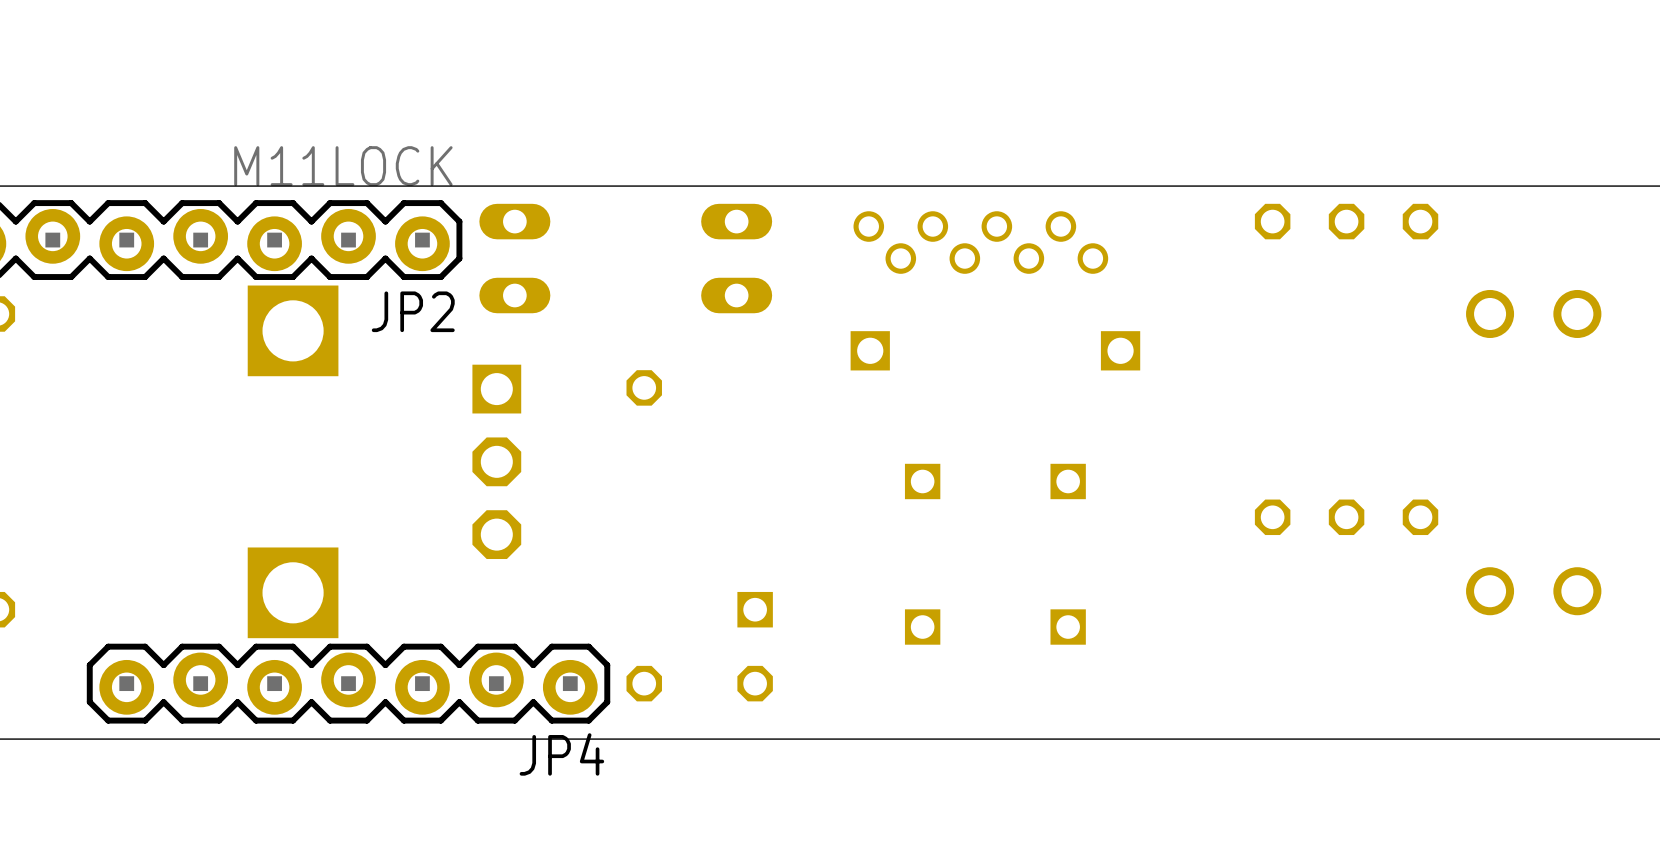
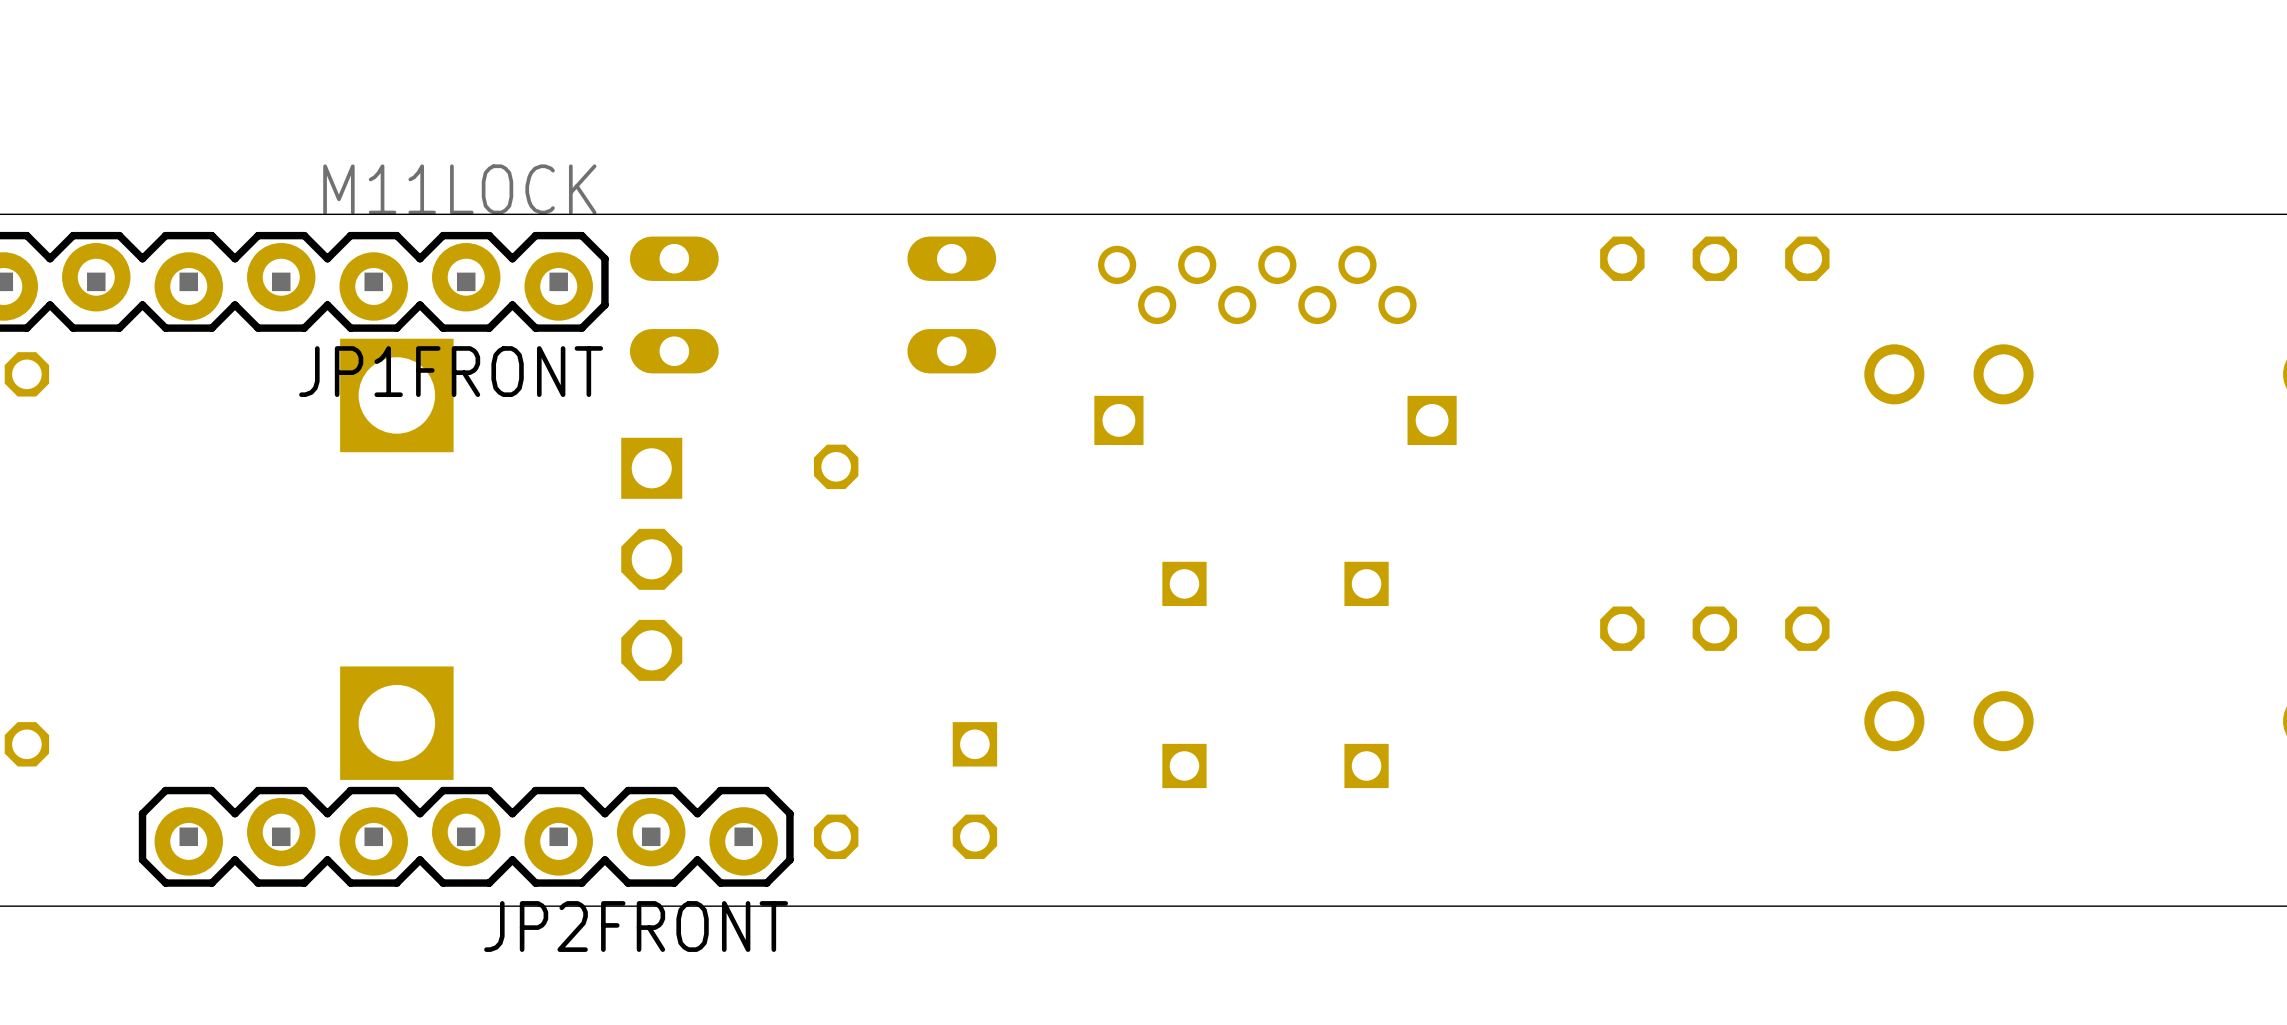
JP2 name: JP2 (413, 311) -> JP1FRONT (451, 371)
JP4 name: JP4 (561, 754) -> JP2FRONT (636, 926)

